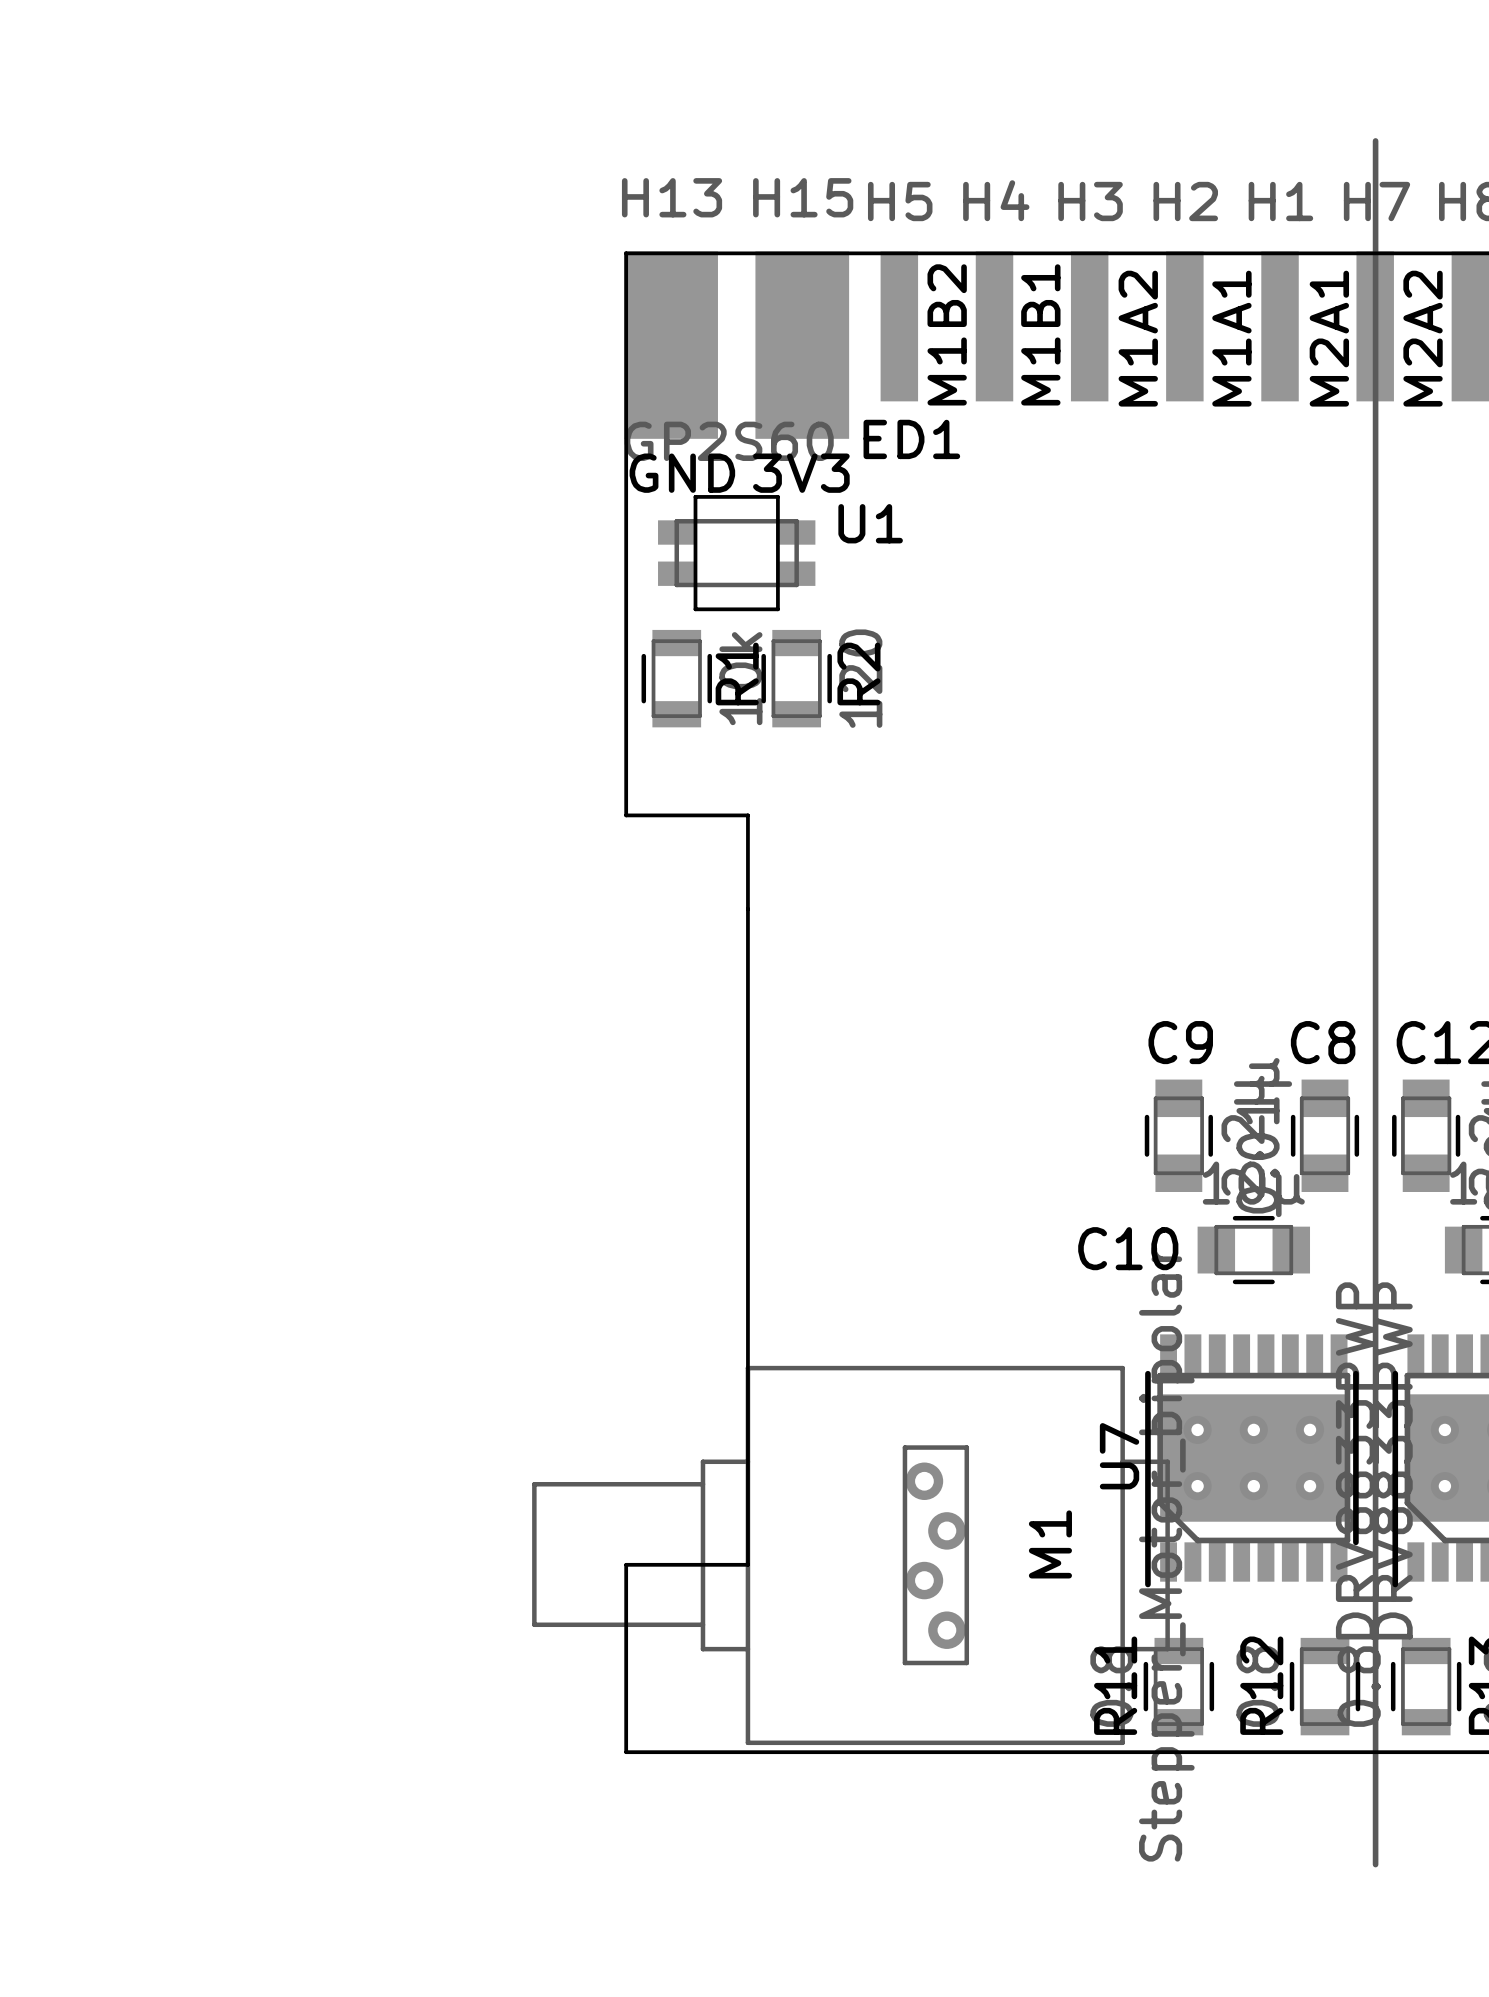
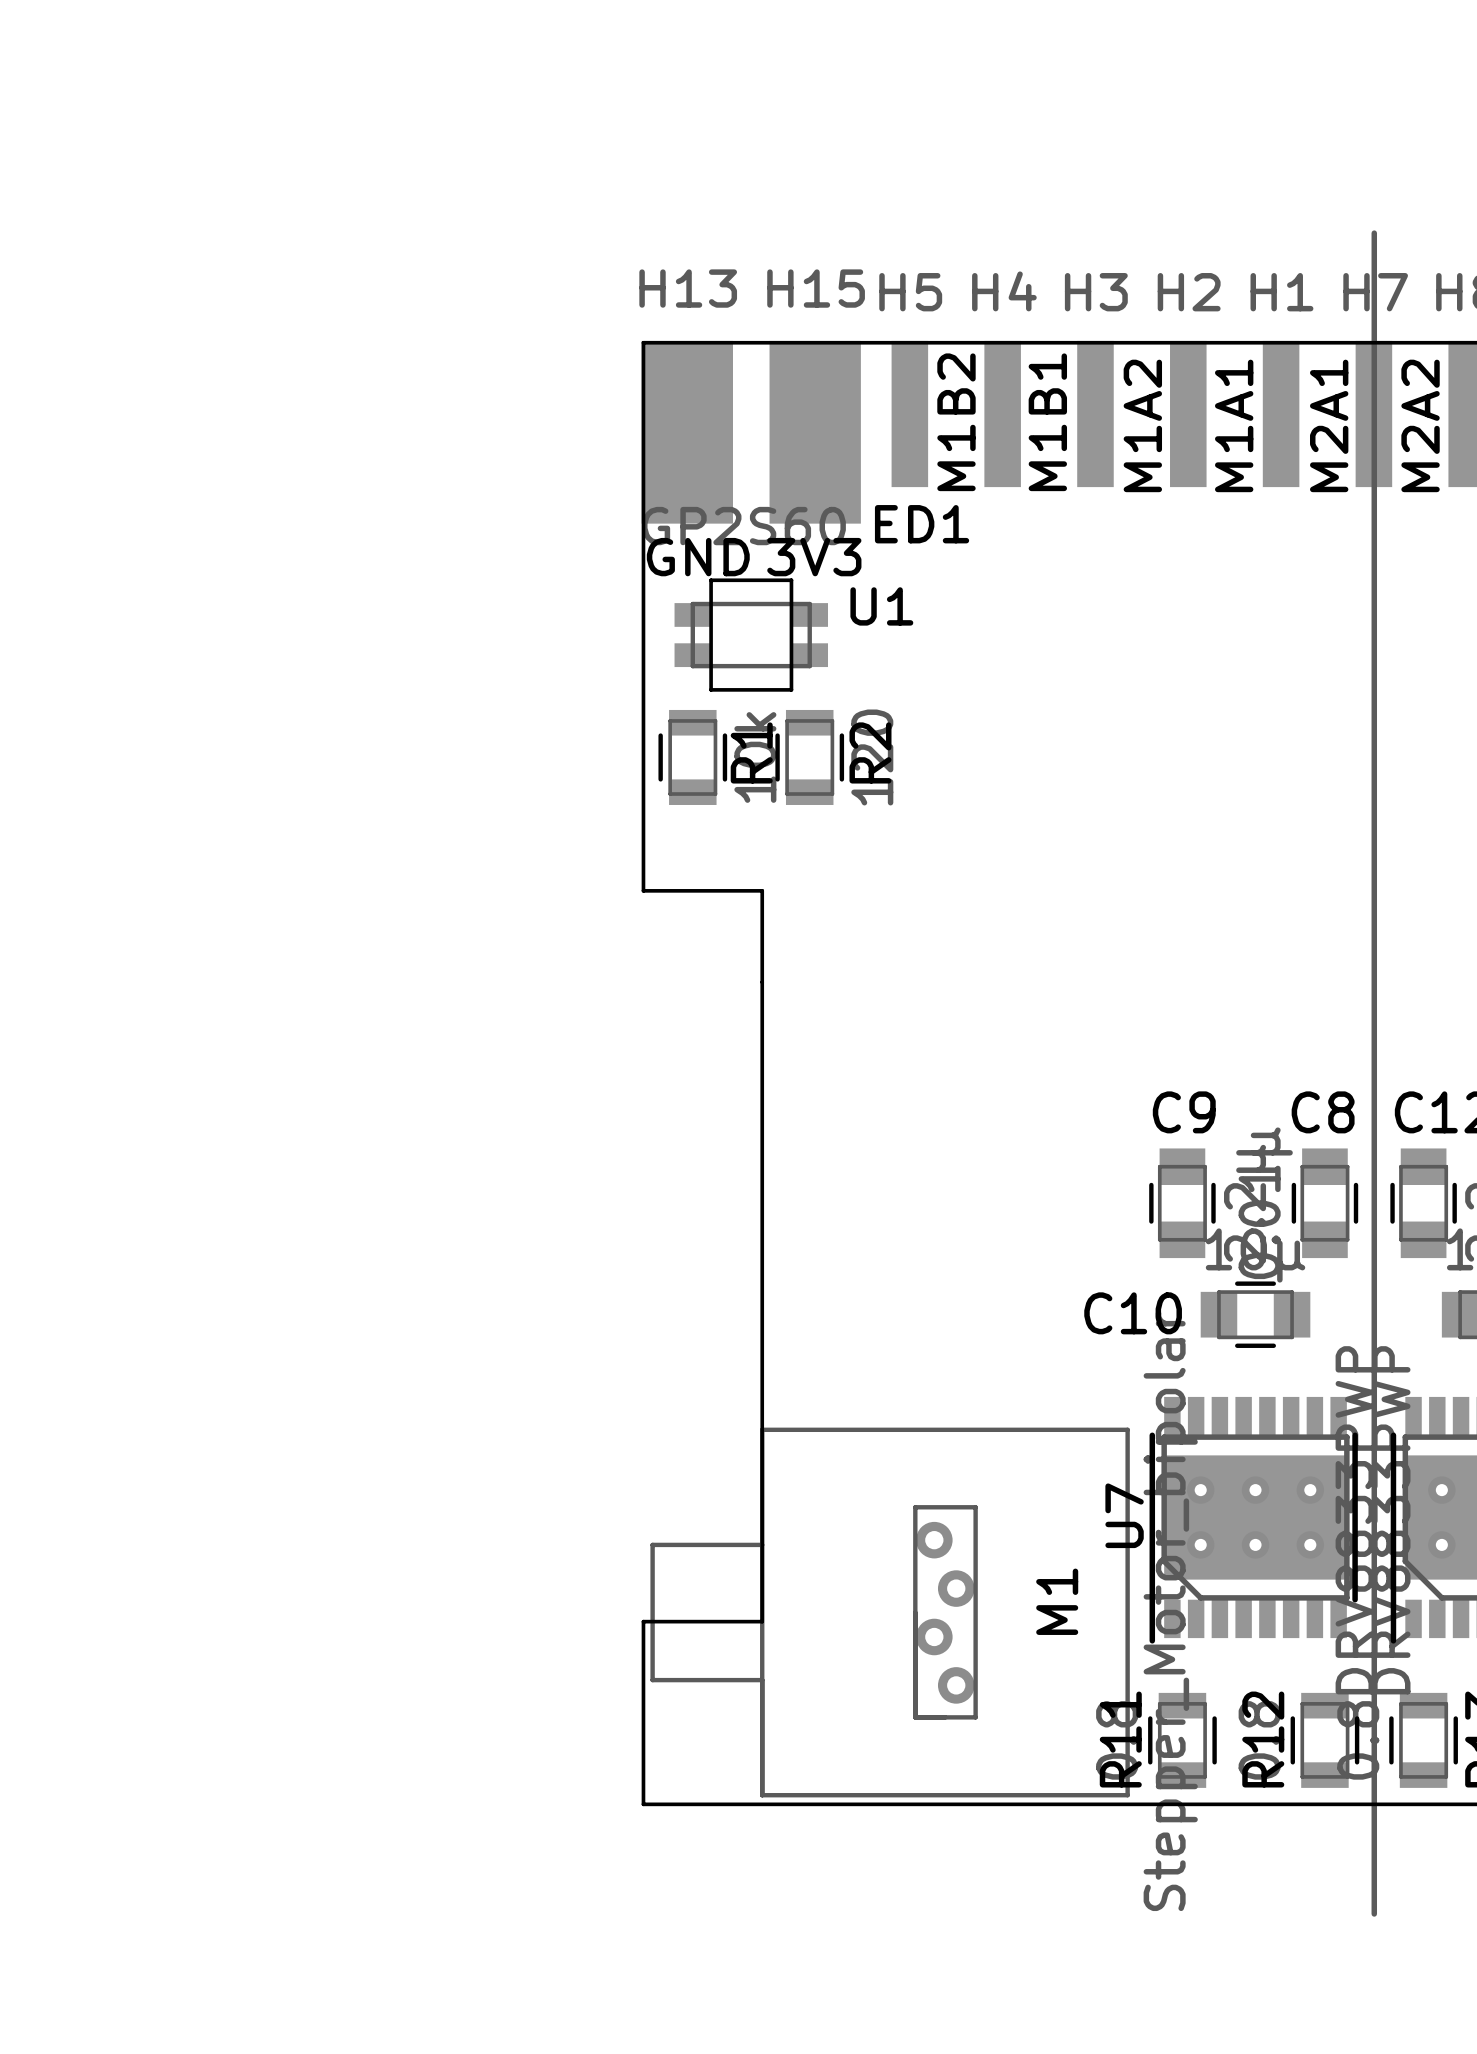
M1 footprint: [532, 1365, 1170, 1746] -> [650, 1427, 1130, 1798]

